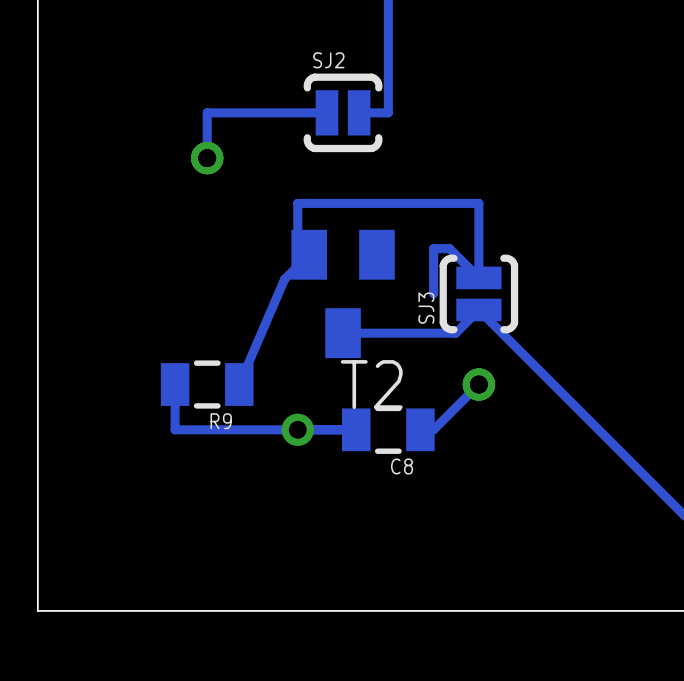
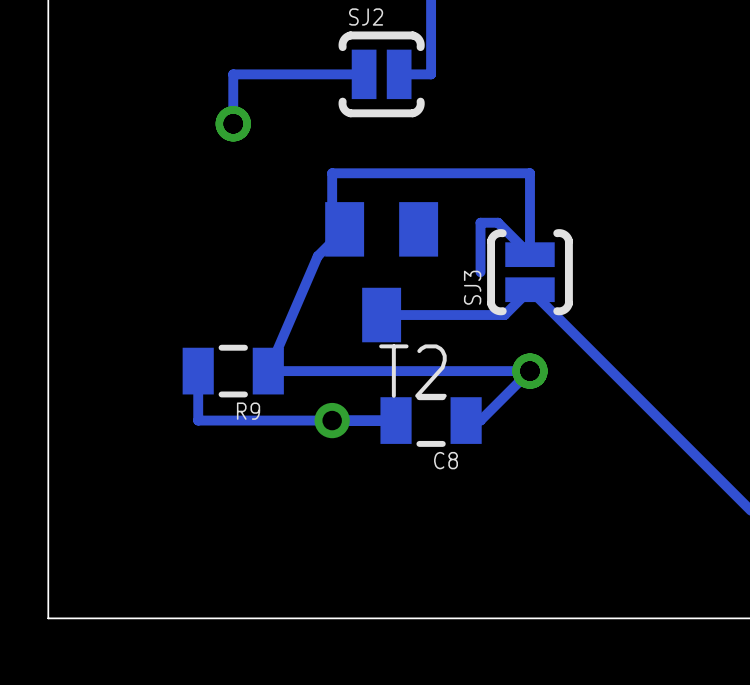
track: none -> (529, 371) (268, 371)

